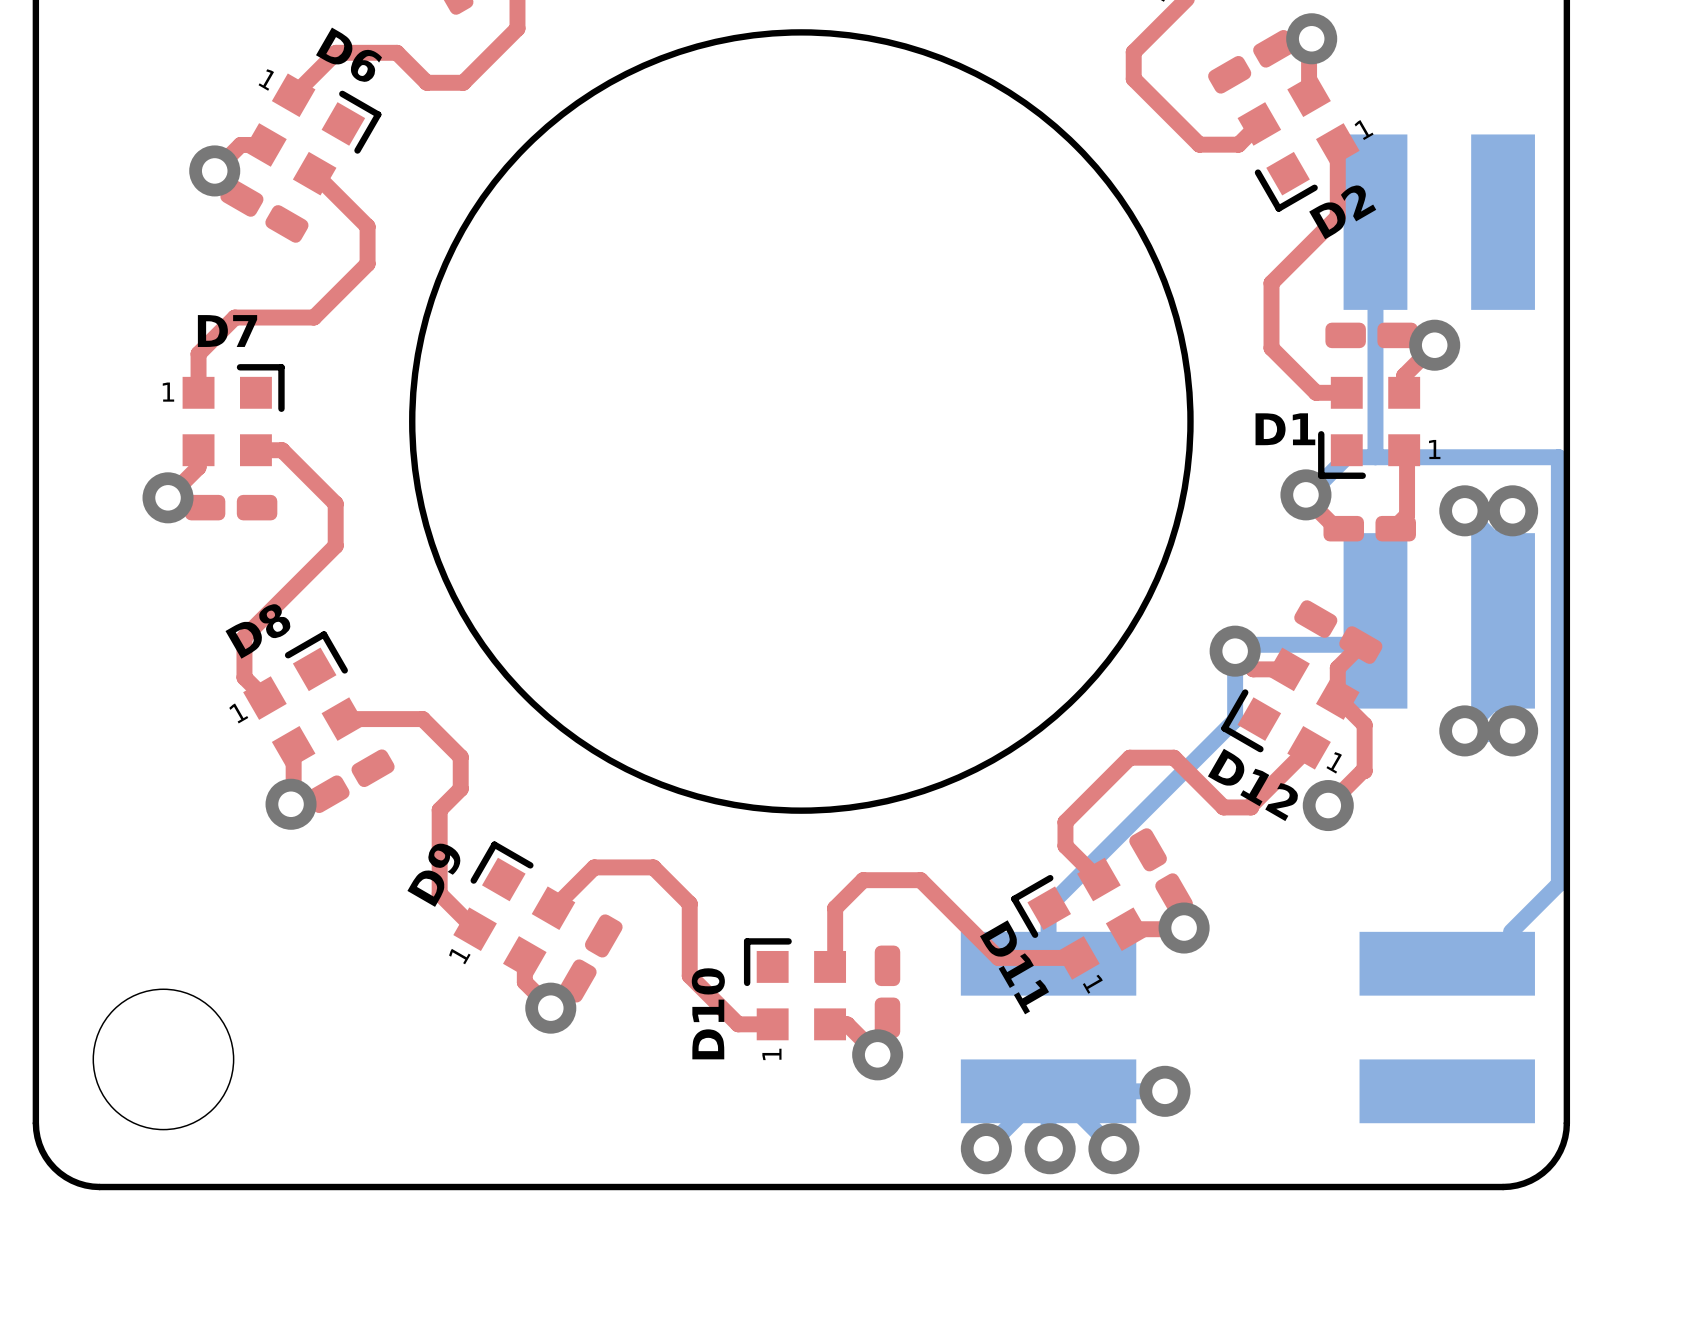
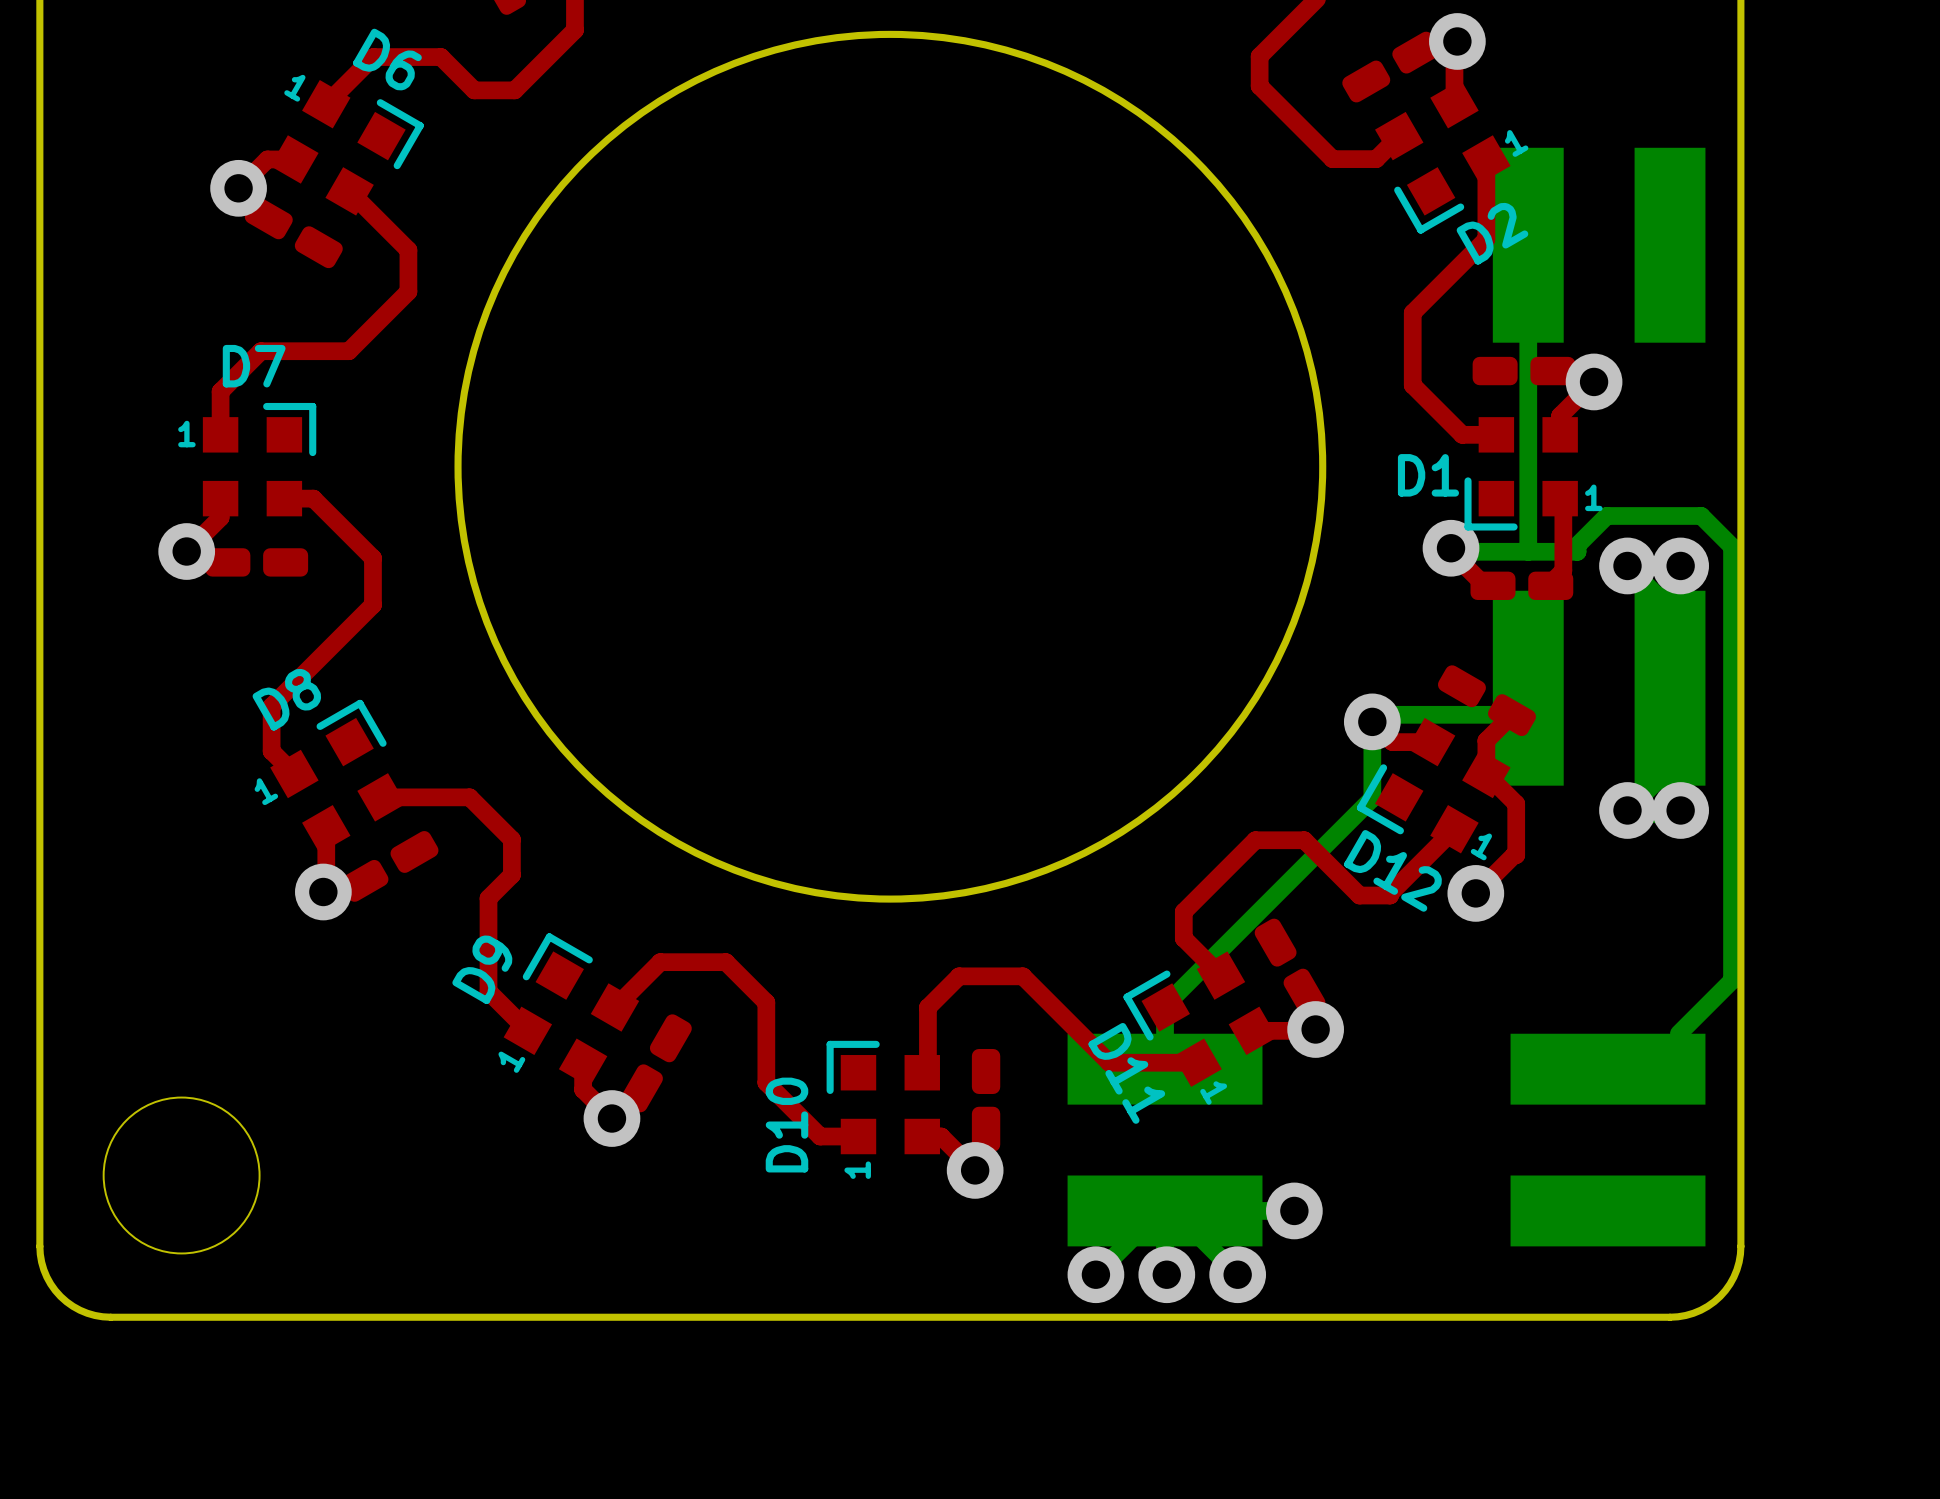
bottom track: none -> (1528, 506) (1528, 551)
bottom track: (1558, 493) (1558, 457) (1346, 457) (1305, 498) -> (1732, 546) (1701, 515) (1606, 515) (1577, 545) (1577, 551) (1451, 551)

